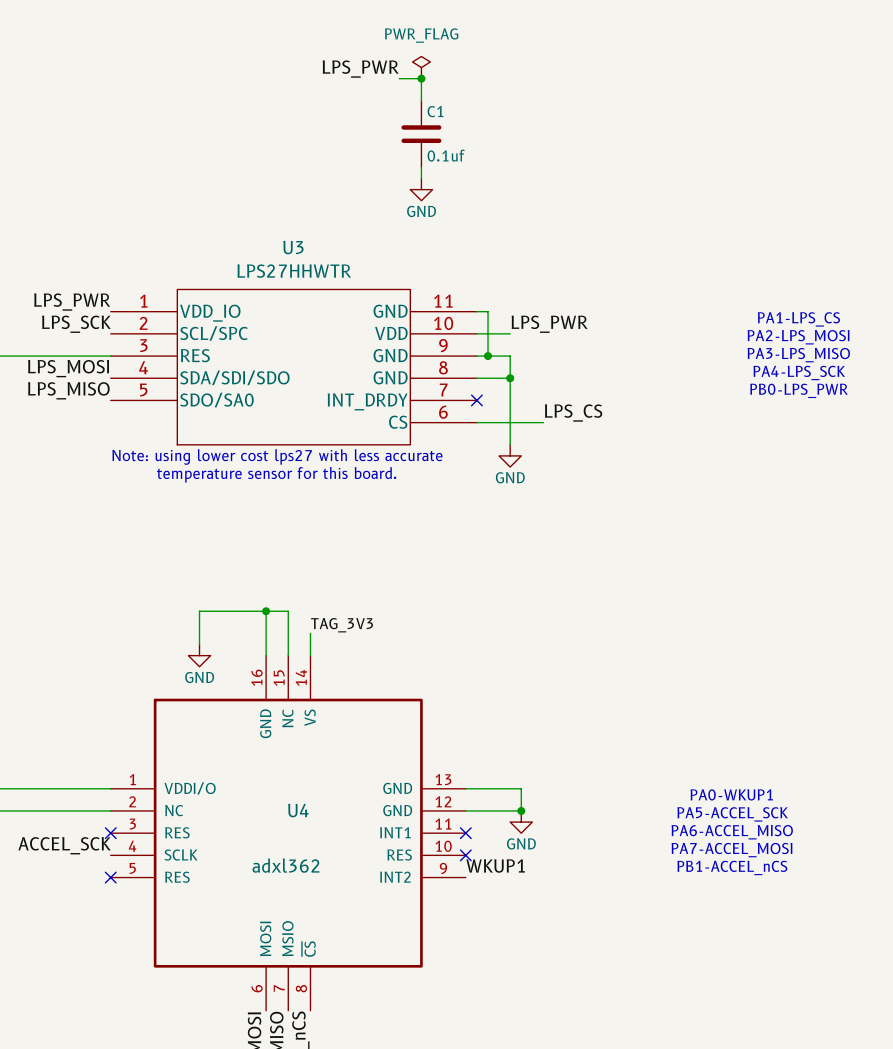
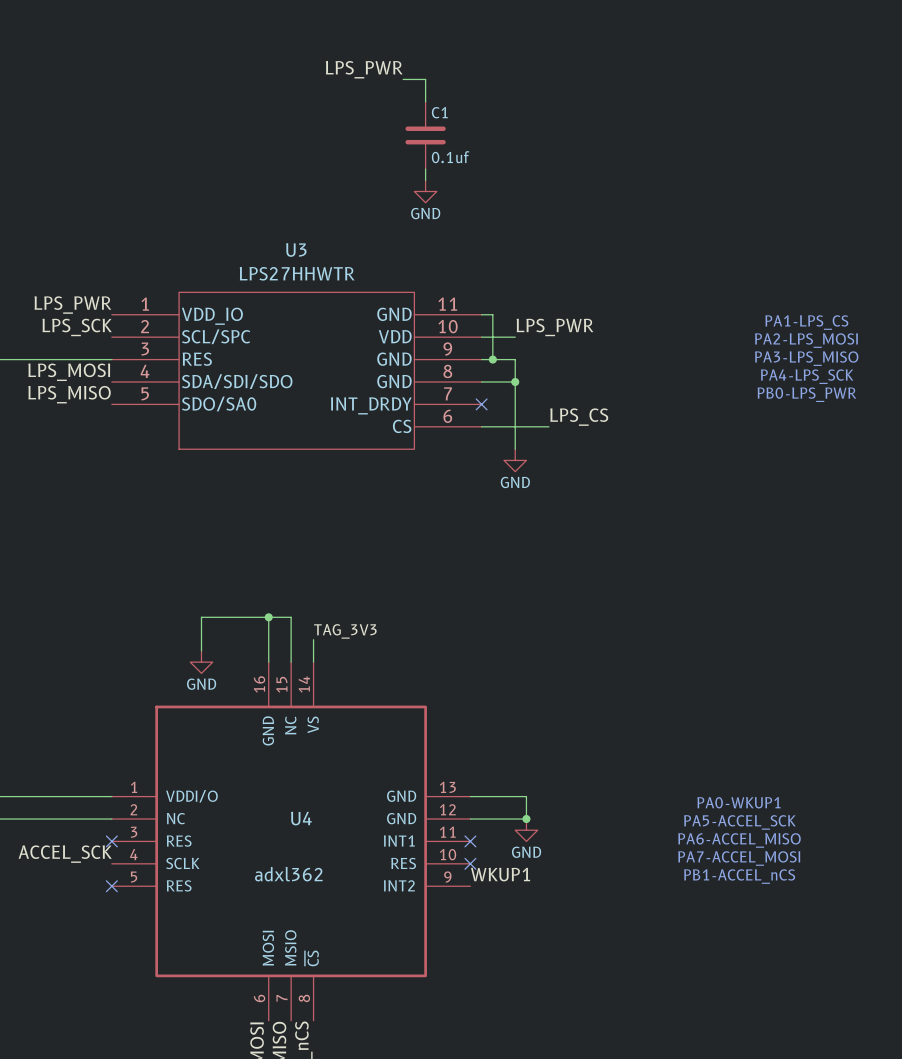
power symbol: PWR_FLAG (421, 67) -> none
junction: (421, 78) -> none
text: Note: using lower cost lps27 with less accurate (277, 457) -> none
text: temperature sensor for this board. (276, 474) -> none

